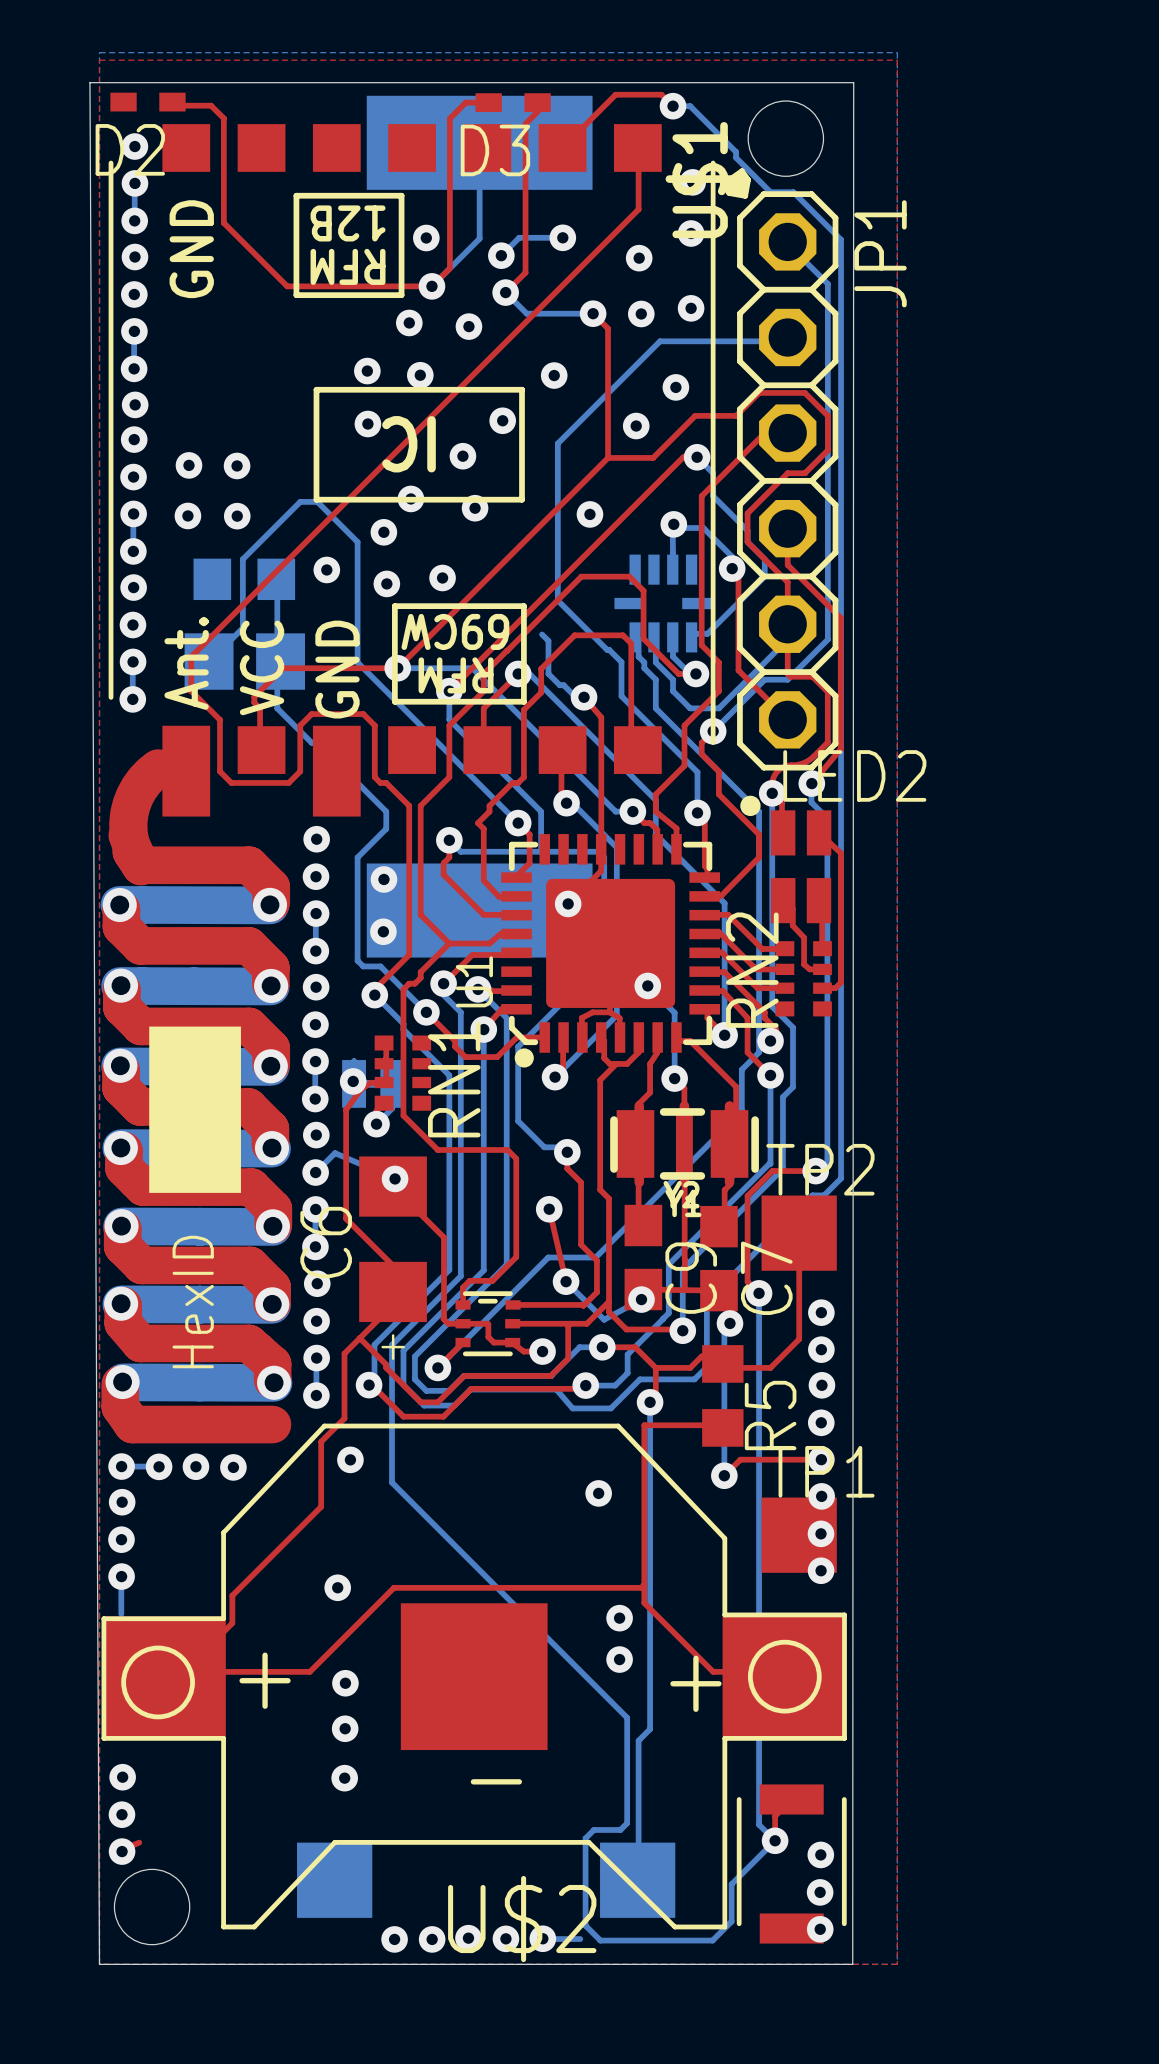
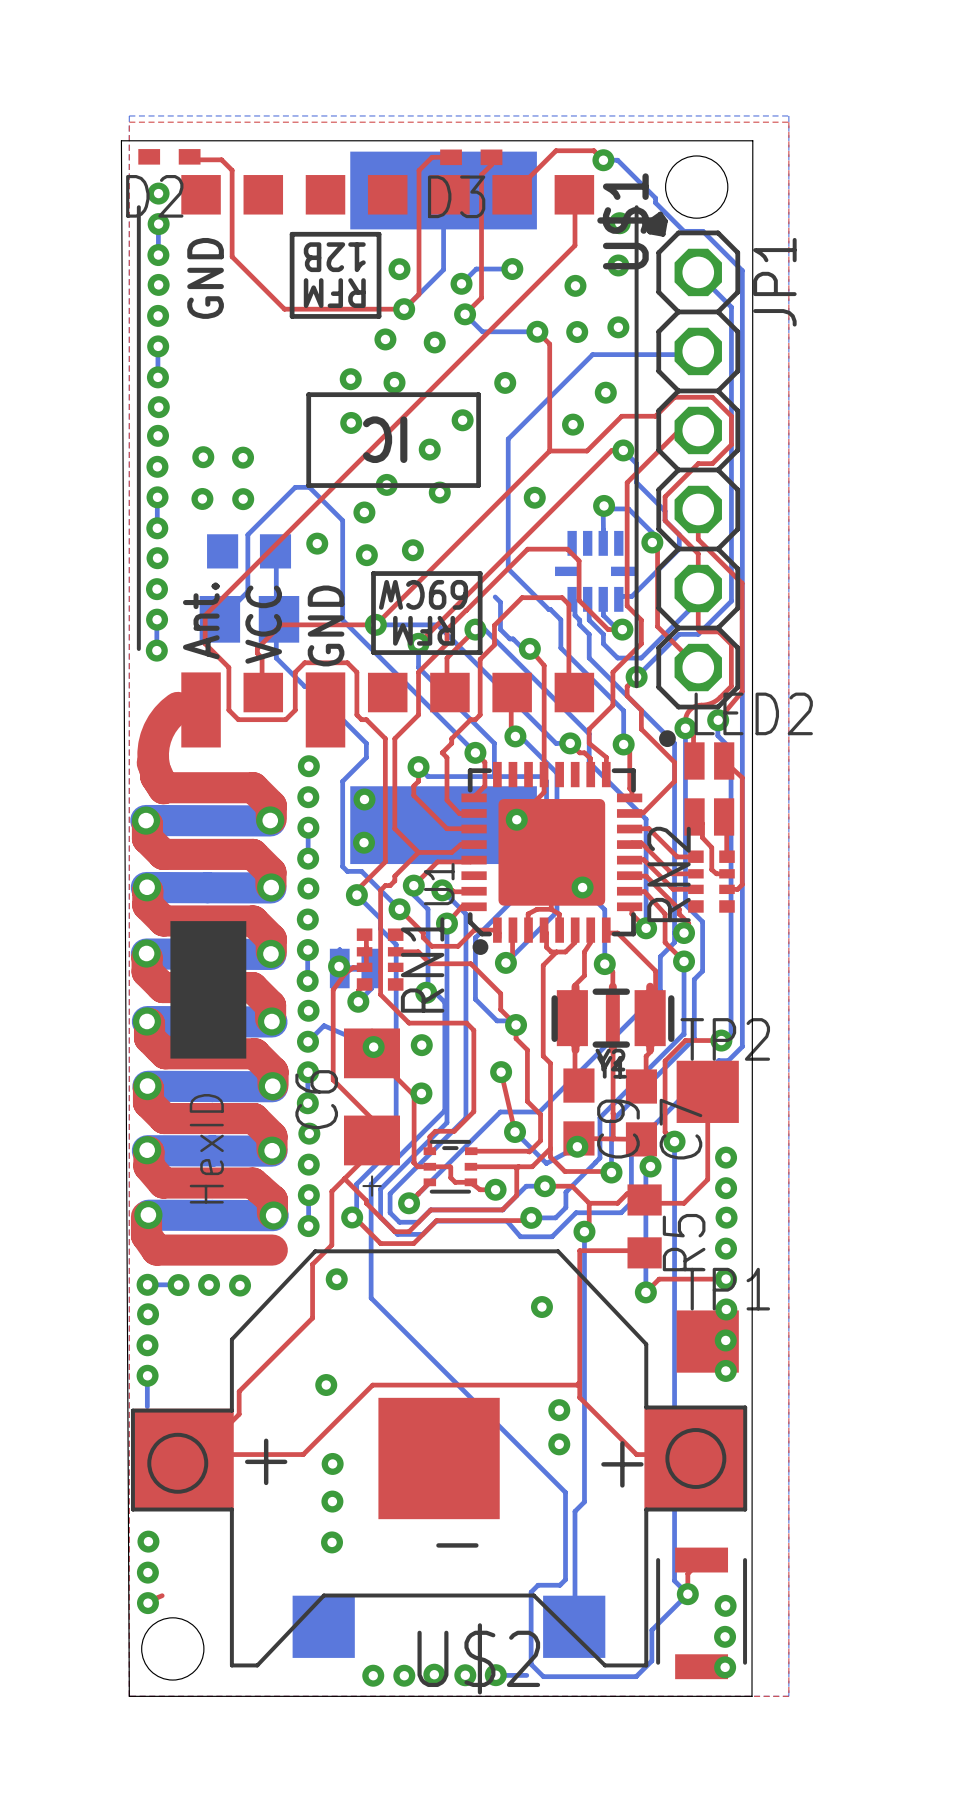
bottom track: (403, 1029) (449, 1075) (449, 1269) (422, 1296) -> (380, 923) (380, 929) (396, 944) (396, 1144)
top track: none -> (395, 951) (418, 951) (430, 963) (470, 963) (500, 993) (500, 1009) (516, 1025)
bottom track: (460, 1111) (460, 1276) -> (426, 992) (433, 990) (444, 1002) (444, 1110) (428, 1127)
via: none -> (426, 992)
via: none -> (421, 1045)
via: none -> (421, 1093)

